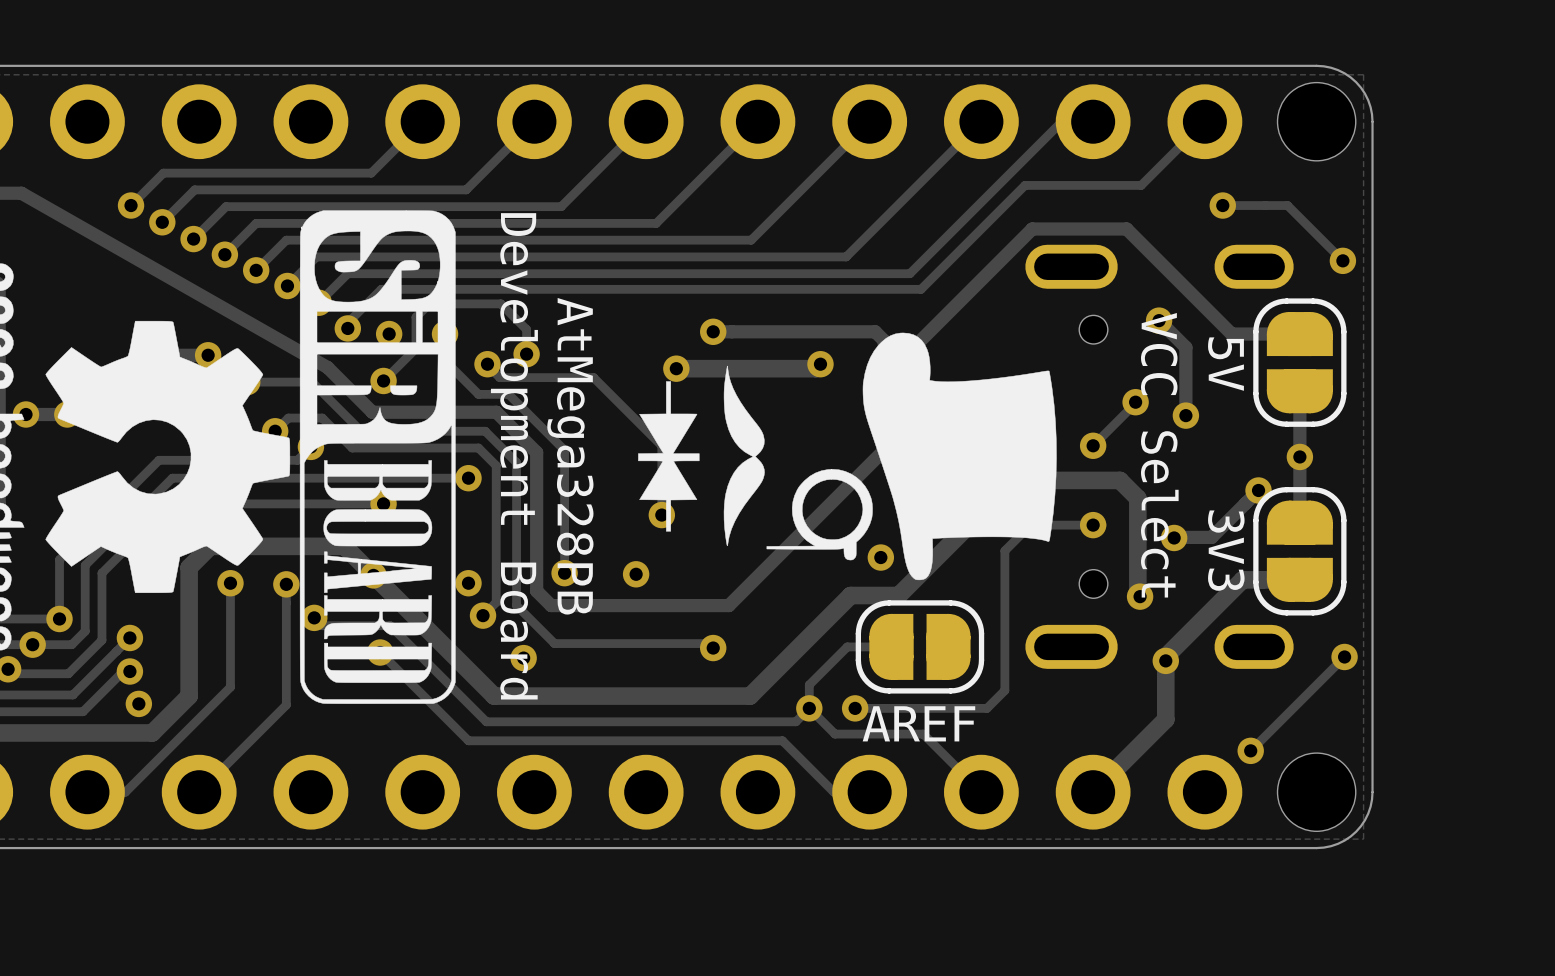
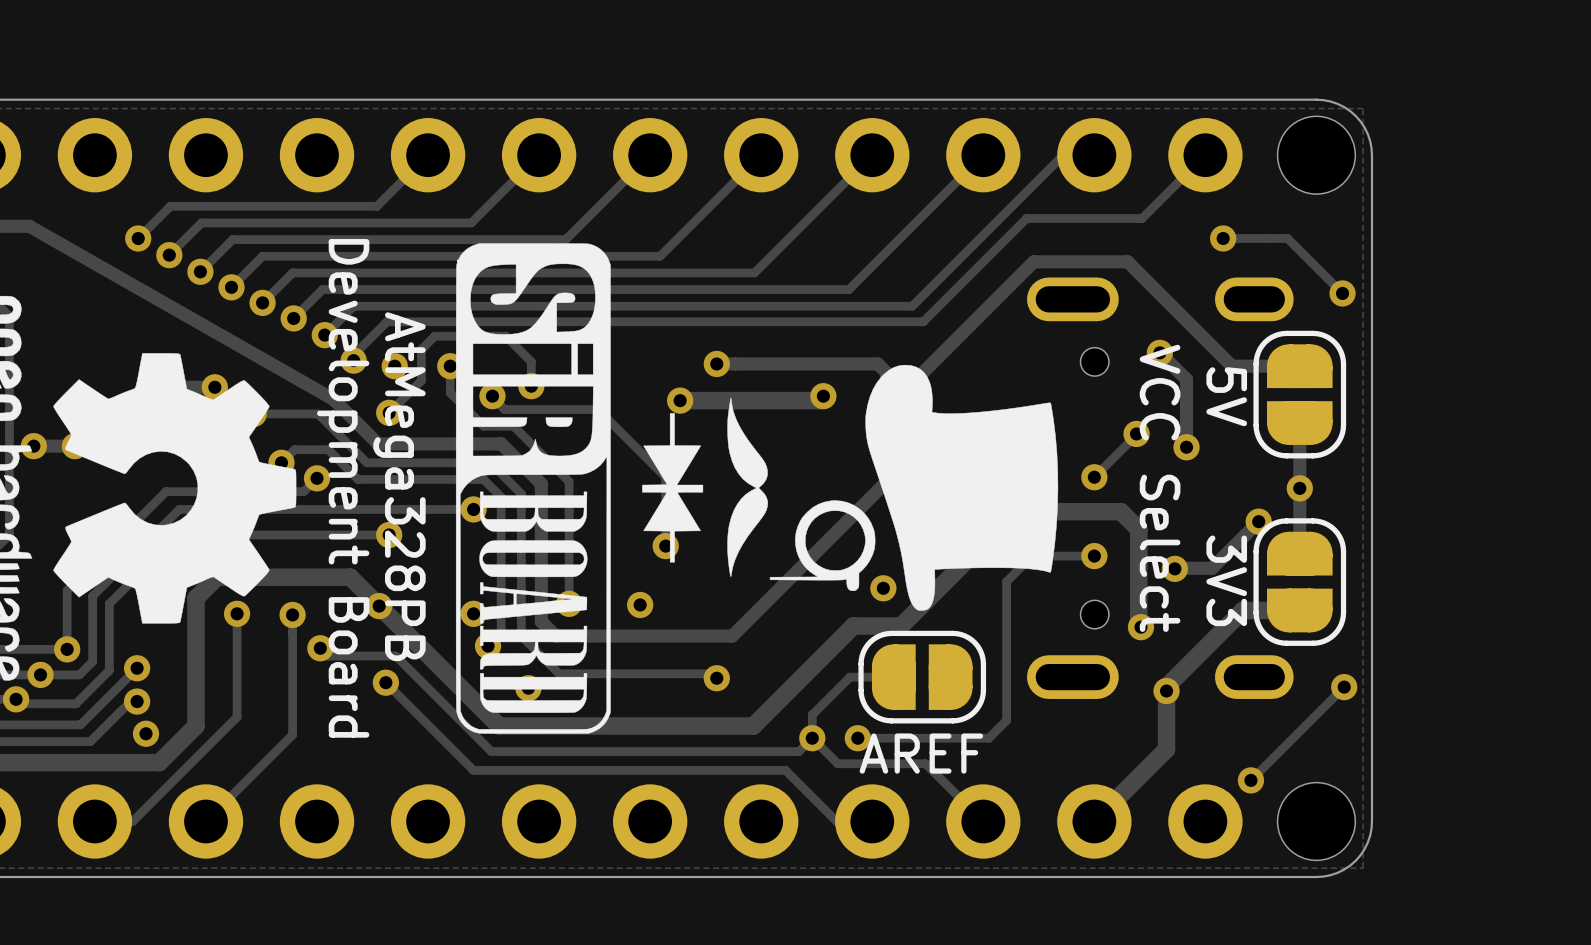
text position: Development Board (514, 456) -> Development Board (343, 488)
text position: AtMega328PB (570, 456) -> AtMega328PB (399, 486)
drawing position: (377, 457) -> (533, 488)

